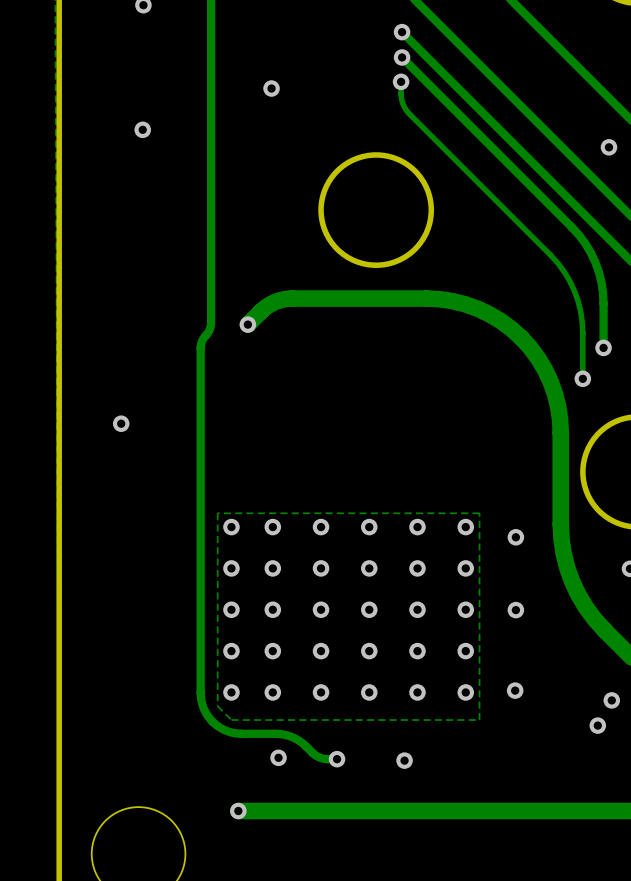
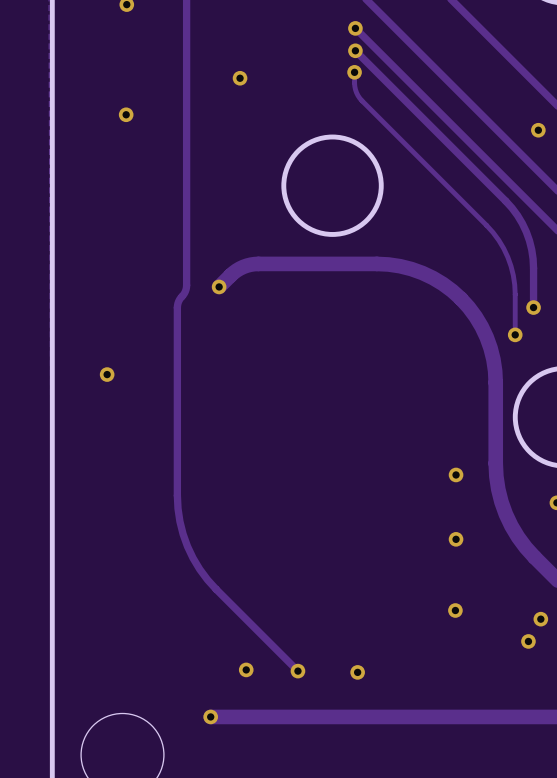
zone outline: (479, 513) (217, 513) (217, 706) (231, 720) (479, 720) (479, 513) -> none
via: (231, 527) -> none
via: (272, 527) -> none
via: (321, 527) -> none
via: (369, 527) -> none
via: (417, 527) -> none
via: (465, 527) -> none
track: (200, 560) (200, 692) (203, 708) (209, 717) (216, 725) (230, 732) (288, 735) (299, 741) (319, 757) (337, 759) -> (177, 495) (183, 534) (199, 569) (216, 589) (297, 671)
via: (231, 568) -> none
via: (272, 568) -> none
via: (321, 568) -> none
via: (369, 568) -> none
via: (417, 568) -> none
via: (465, 568) -> none
via: (231, 609) -> none
via: (272, 609) -> none
via: (321, 609) -> none
via: (369, 609) -> none
via: (417, 609) -> none
via: (465, 609) -> none
via: (231, 651) -> none
via: (272, 651) -> none
via: (321, 651) -> none
via: (369, 651) -> none
via: (417, 651) -> none
via: (465, 651) -> none
via: (231, 692) -> none
via: (272, 692) -> none
via: (321, 692) -> none
via: (369, 692) -> none
via: (417, 692) -> none
via: (465, 692) -> none

